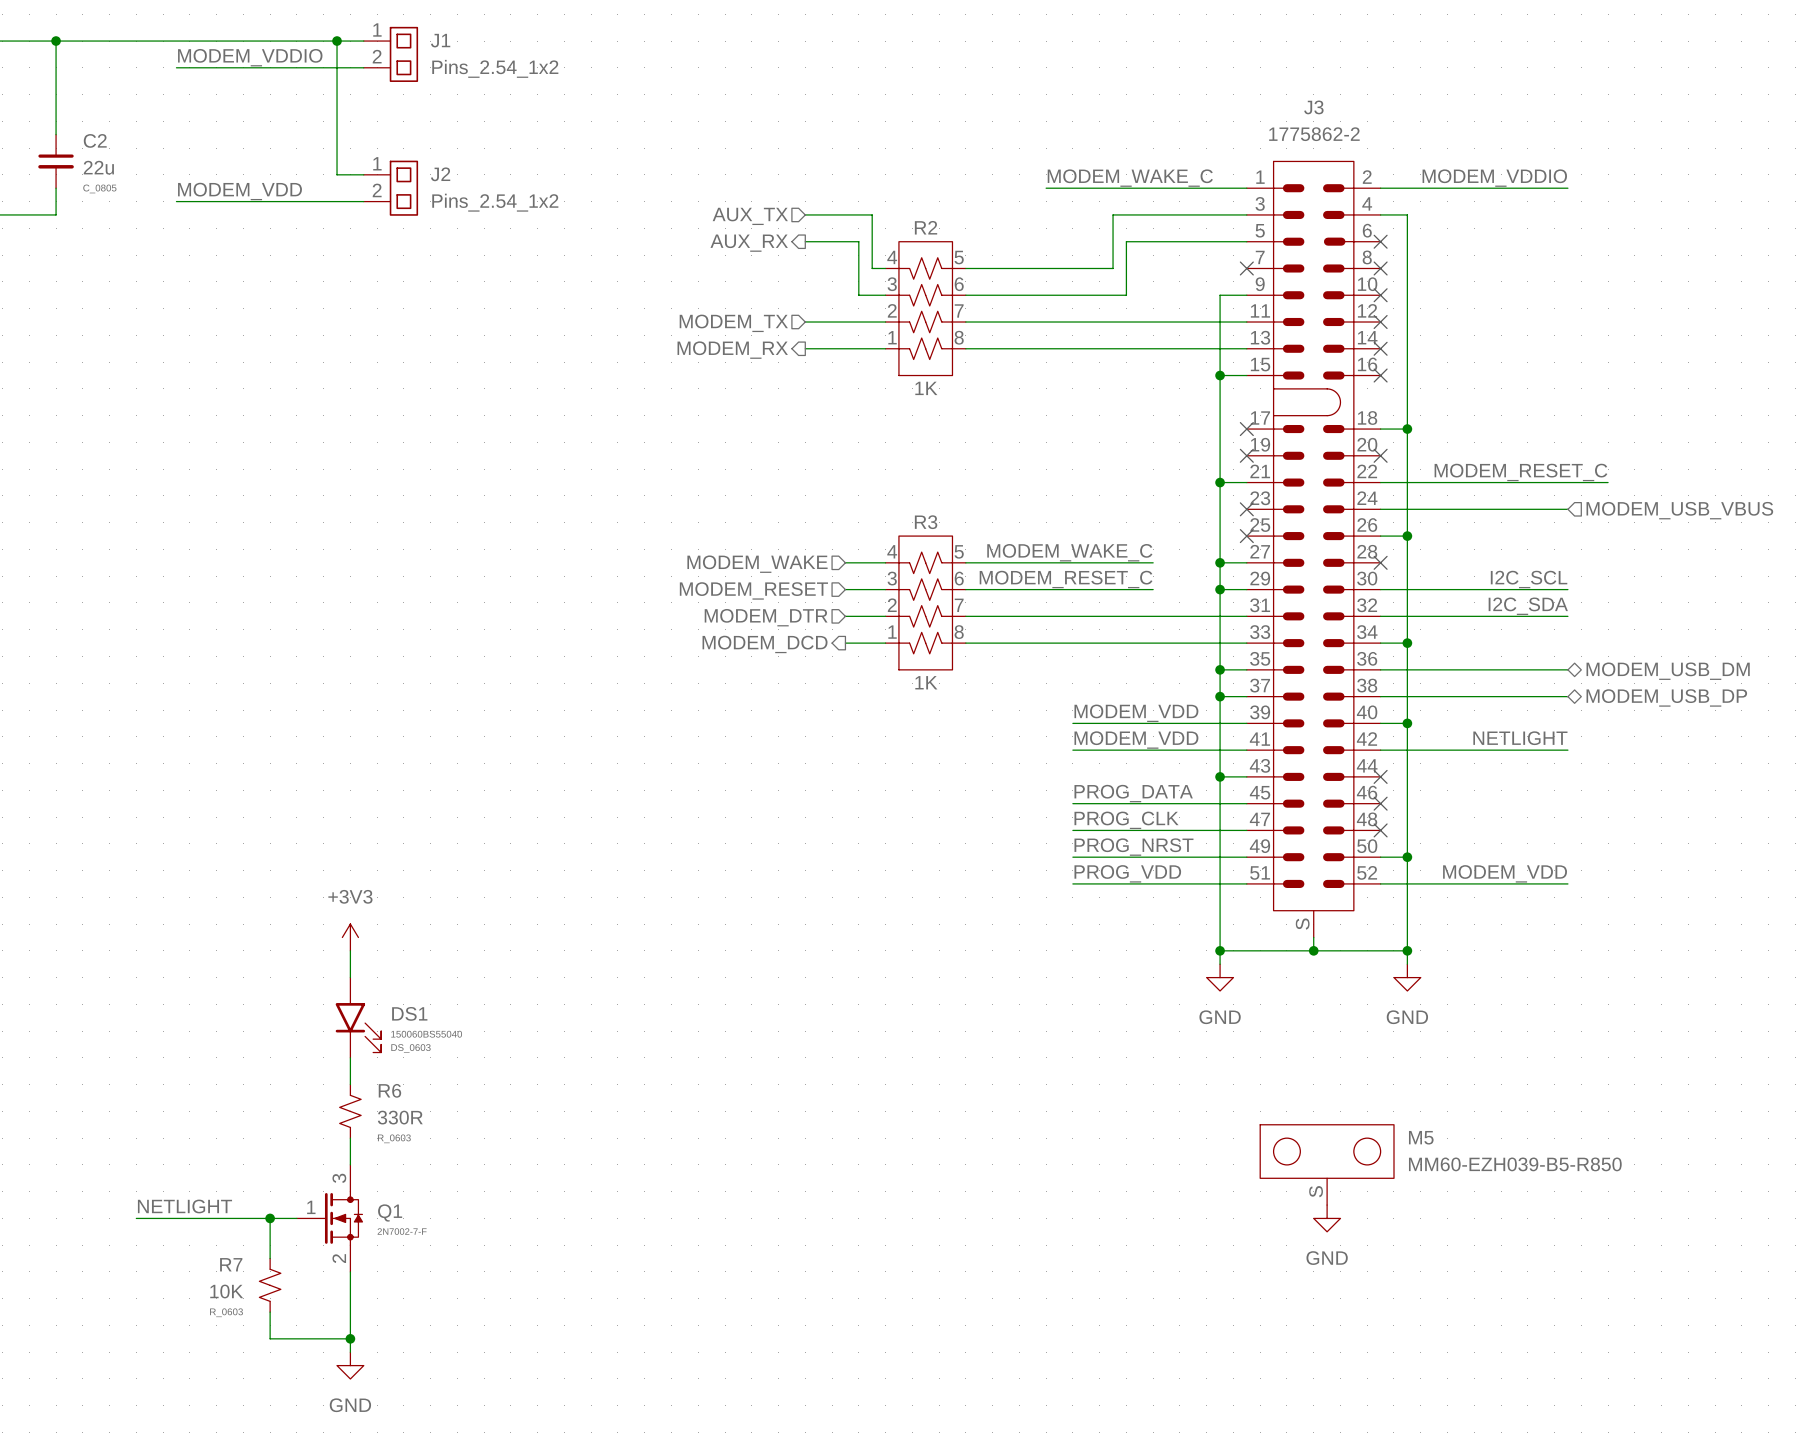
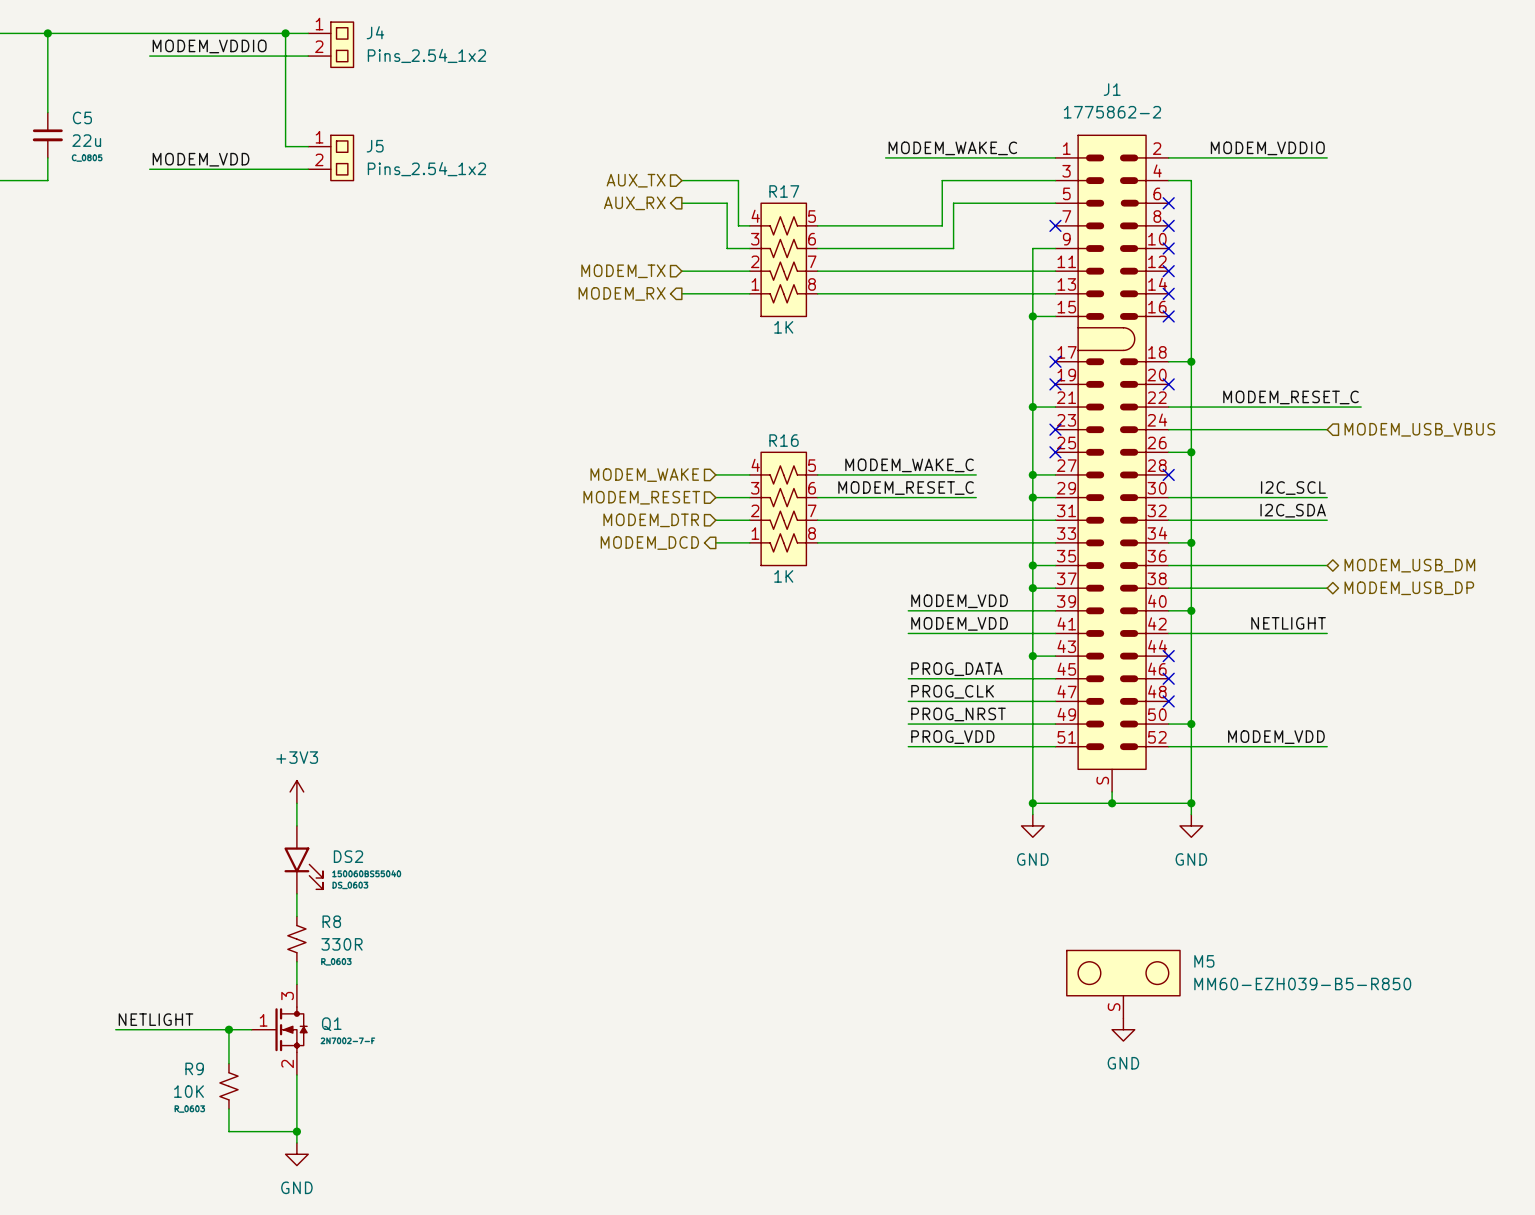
J1 name: J1 (440, 40) -> J4 (375, 32)
J3 name: J3 (1313, 107) -> J1 (1112, 89)
C2 name: C2 (95, 140) -> C5 (82, 117)
J2 name: J2 (440, 174) -> J5 (375, 146)
R2 name: R2 (926, 227) -> R17 (784, 191)
R3 name: R3 (926, 522) -> R16 (784, 440)
DS1 name: DS1 (409, 1013) -> DS2 (348, 856)
R6 name: R6 (389, 1090) -> R8 (331, 921)
R7 name: R7 (231, 1264) -> R9 (194, 1068)

